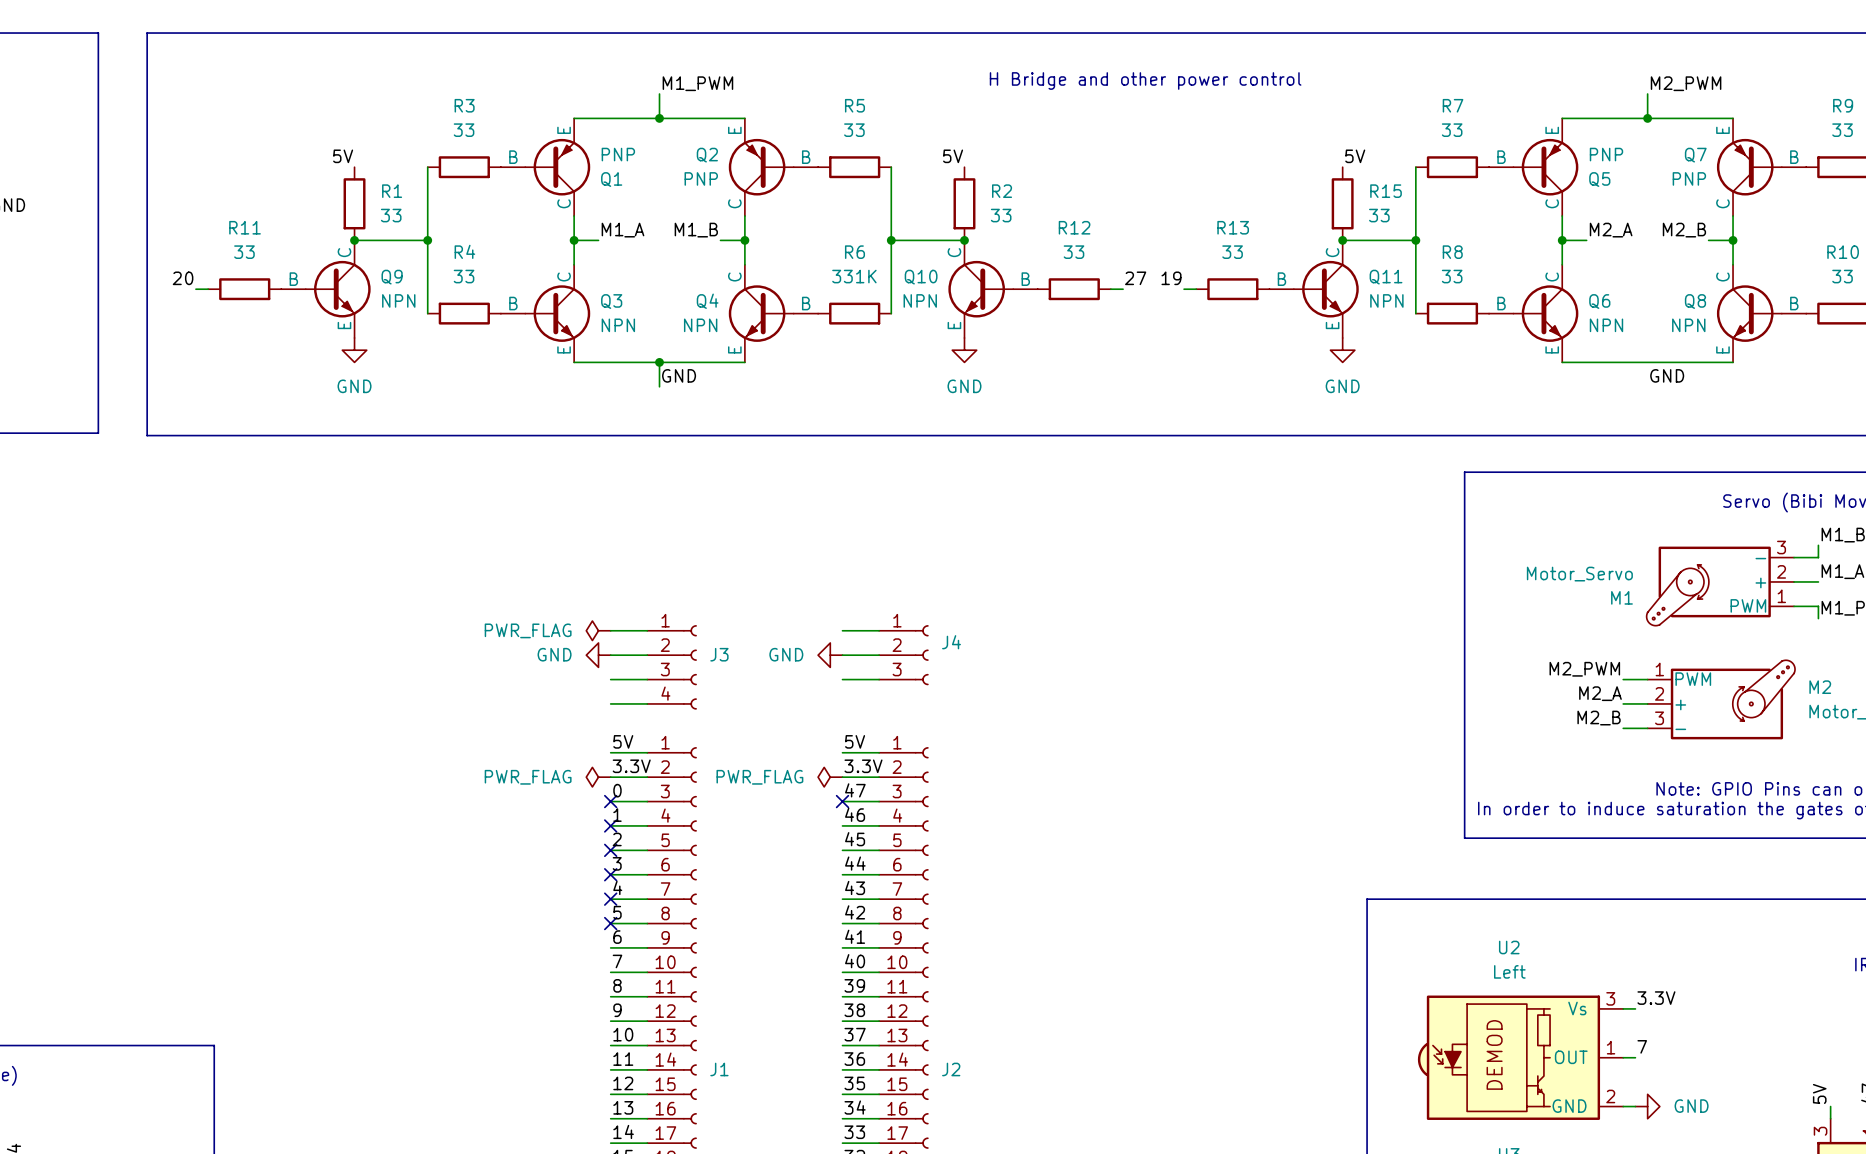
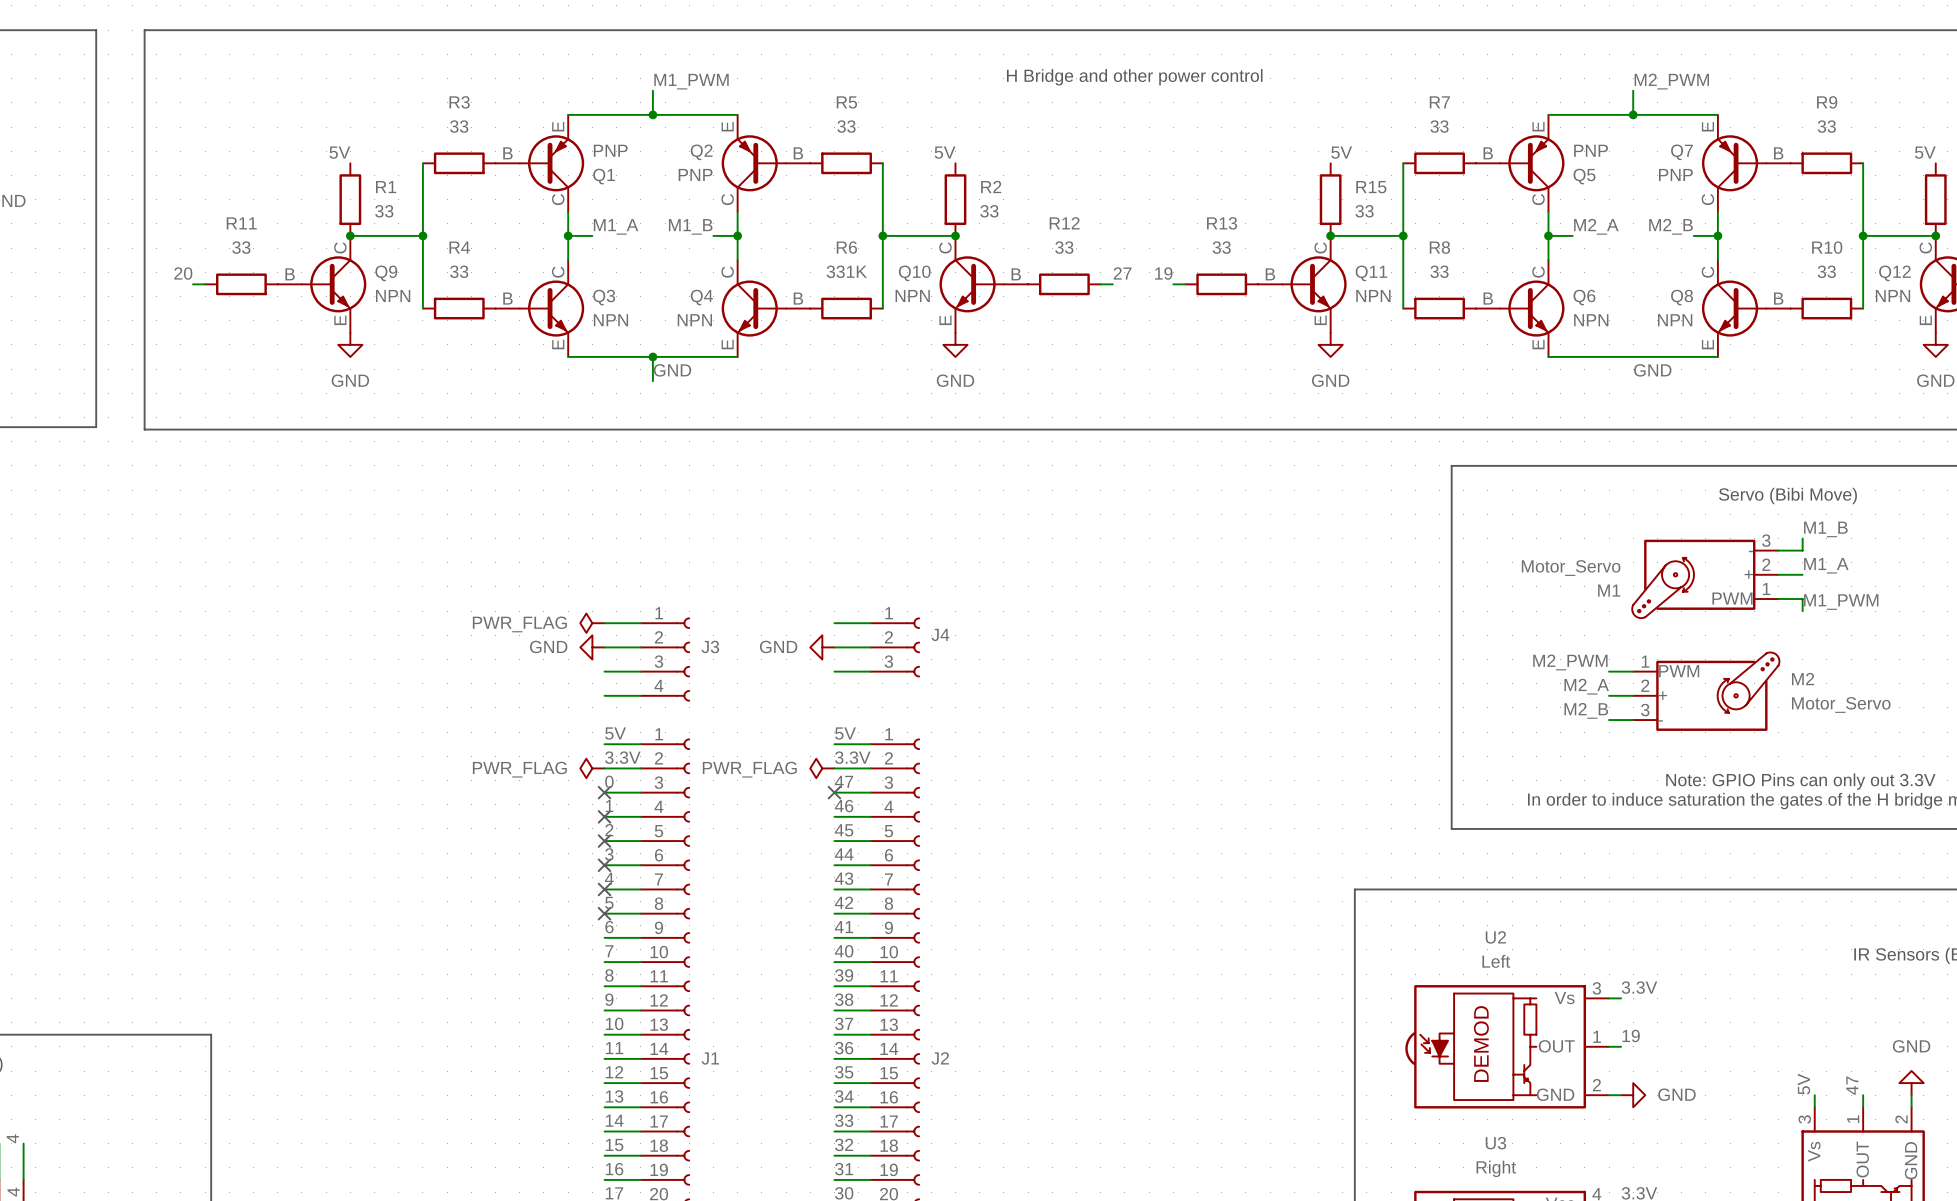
label: 7 (1642, 1046) -> 19 (1631, 1035)

